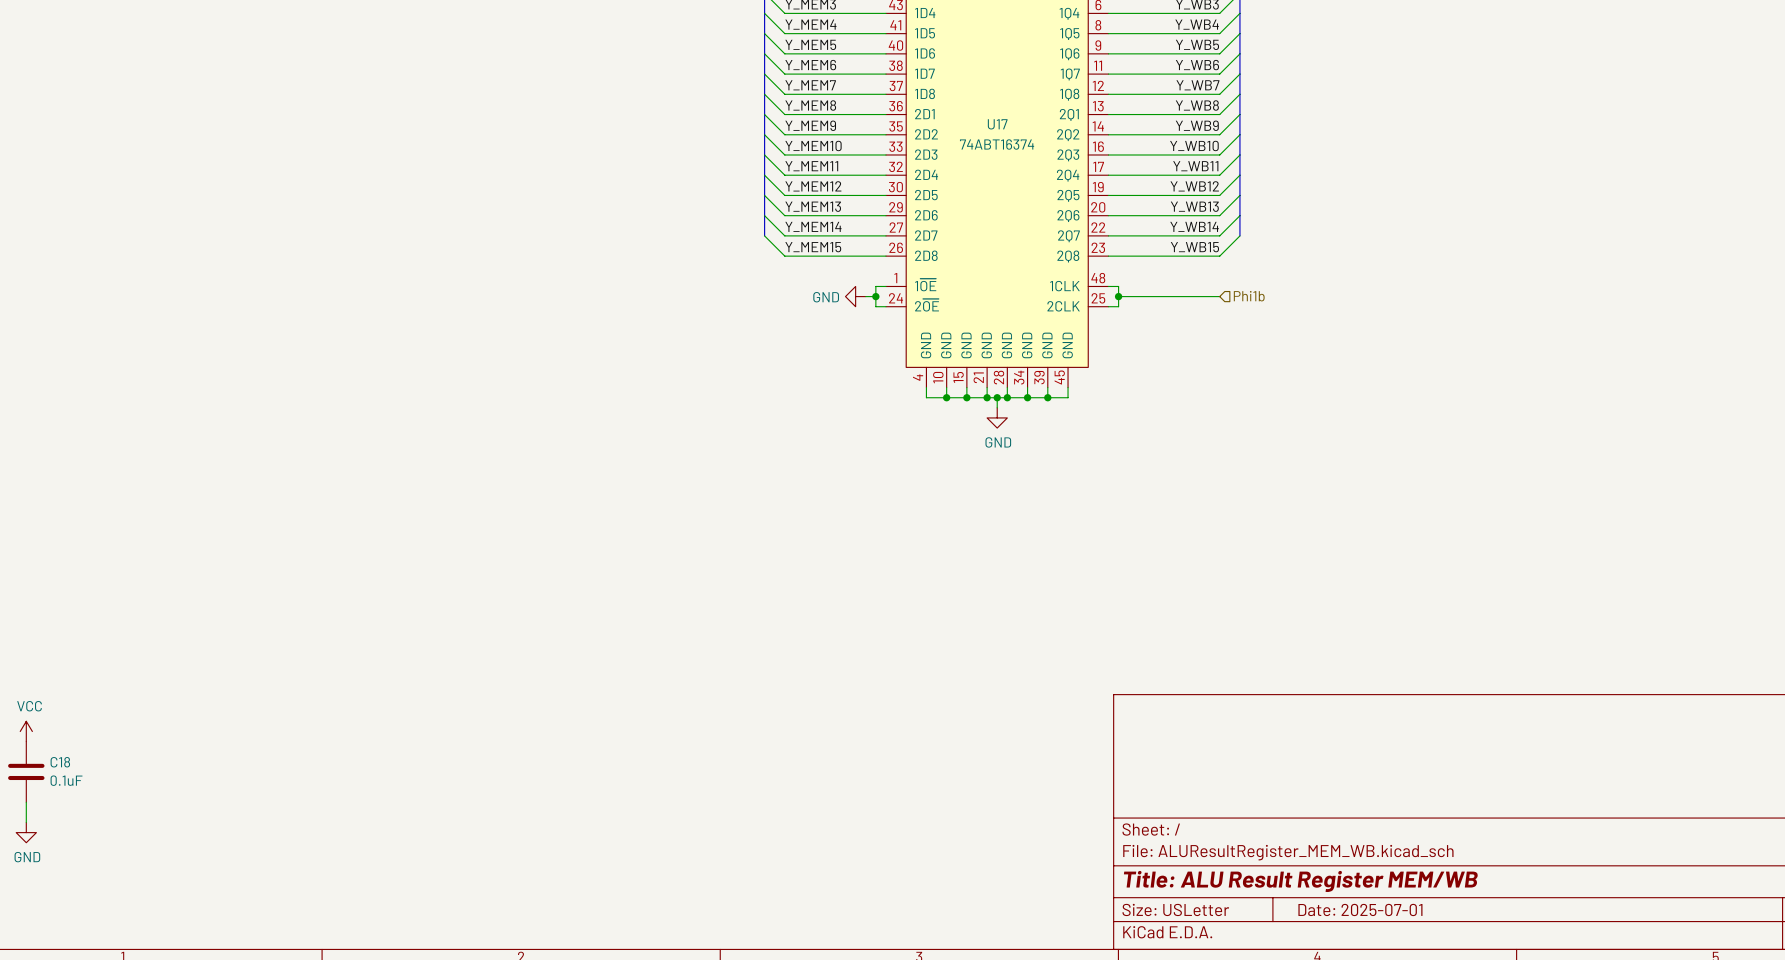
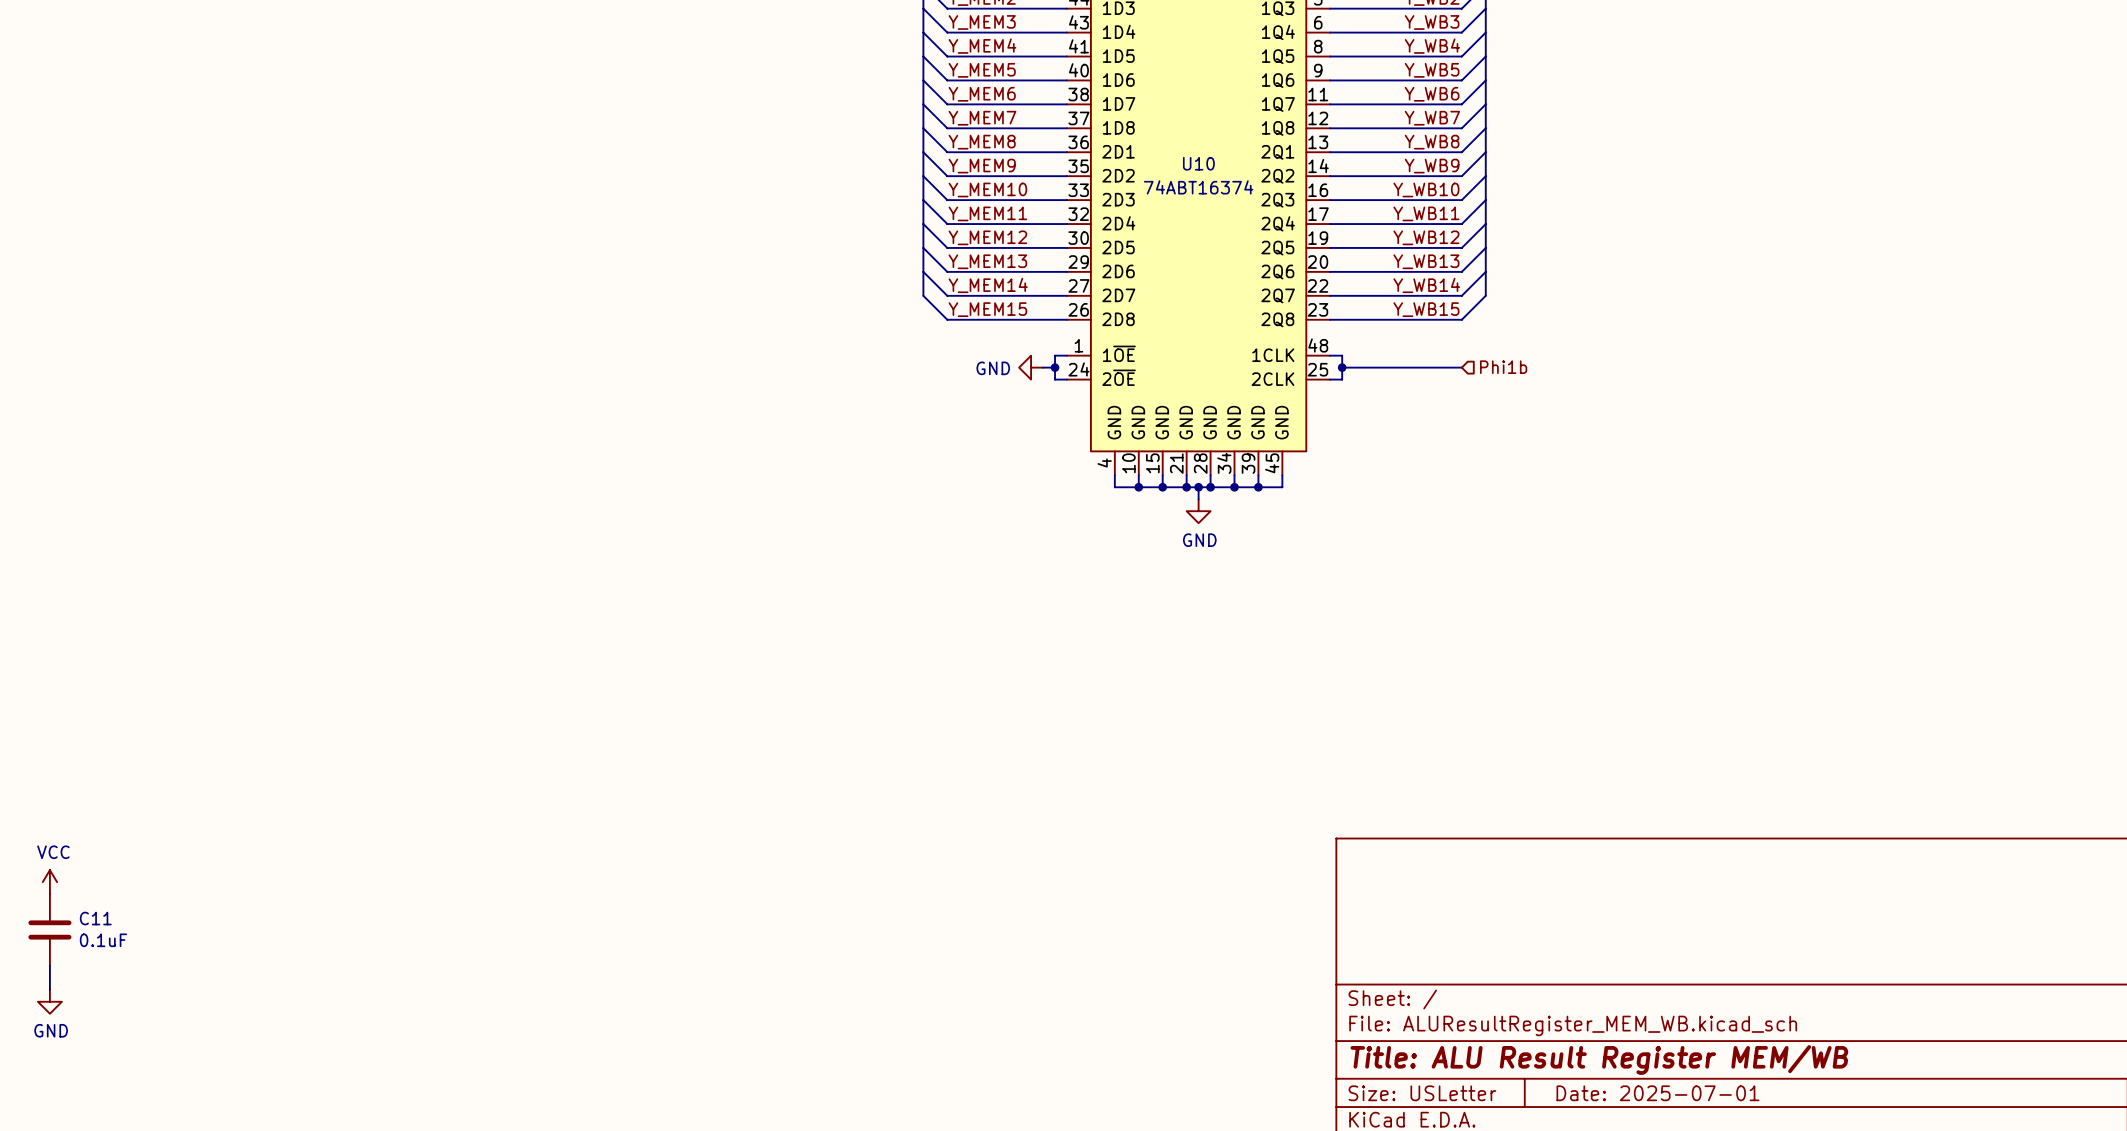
U17 name: U17 (997, 124) -> U10 (1198, 163)
C18 name: C18 (60, 762) -> C11 (95, 918)

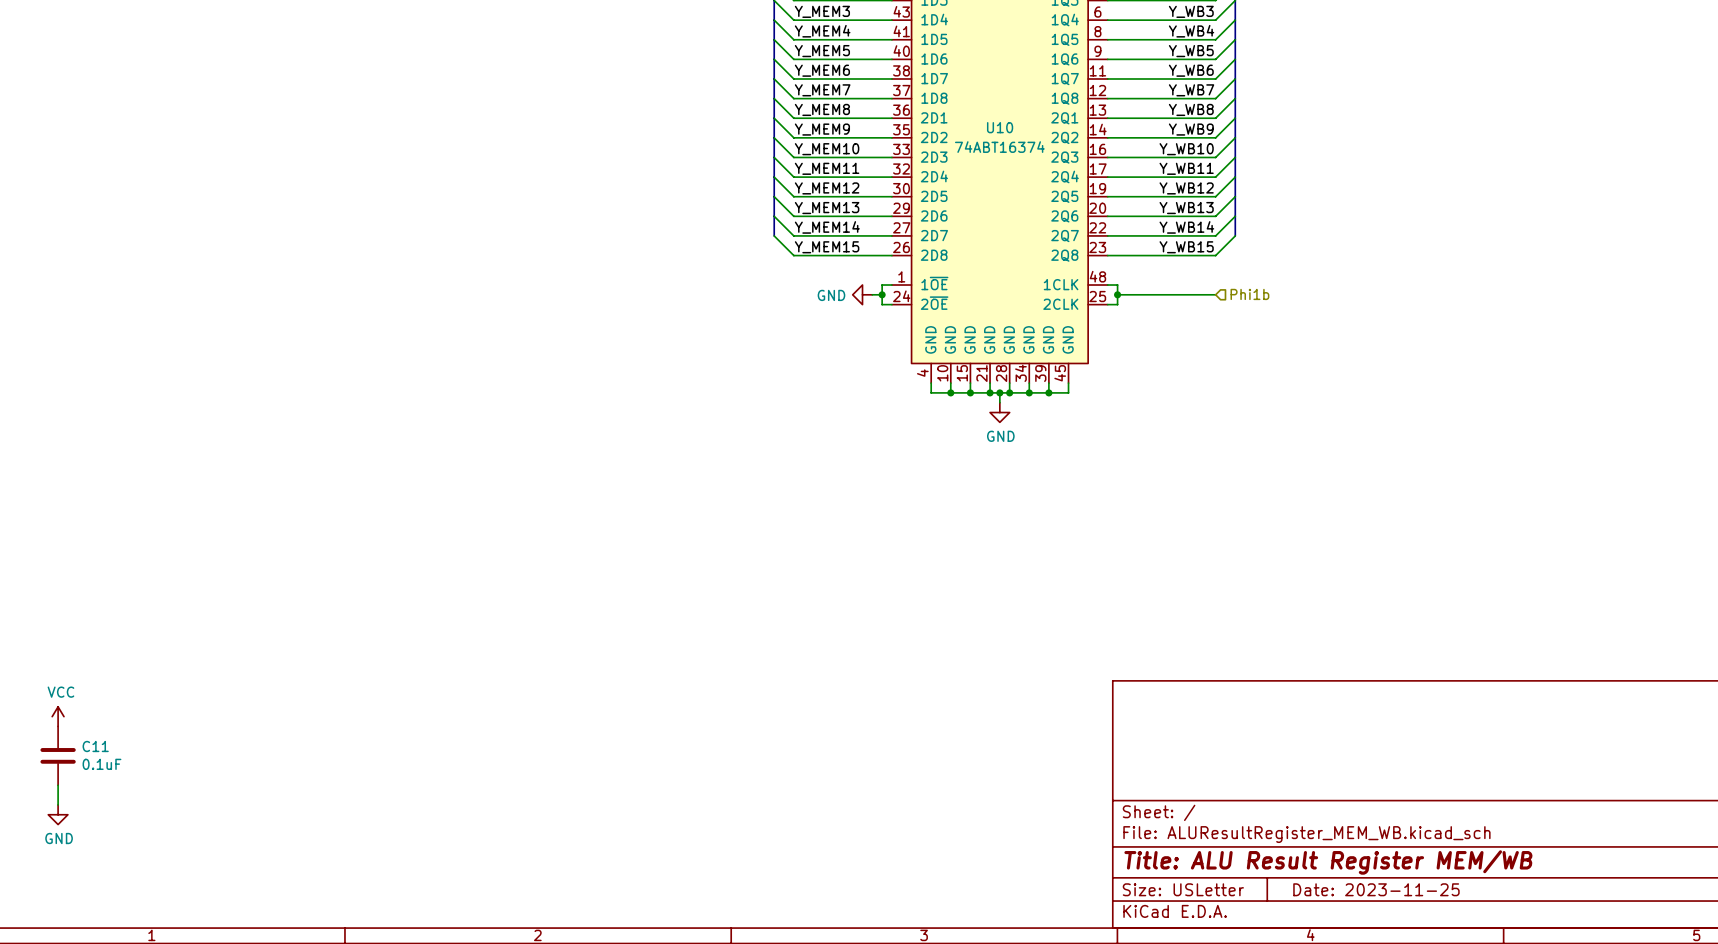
title block: Date: 2025-07-01 (1657, 1093) -> Date: 2023-11-25 (1376, 889)

